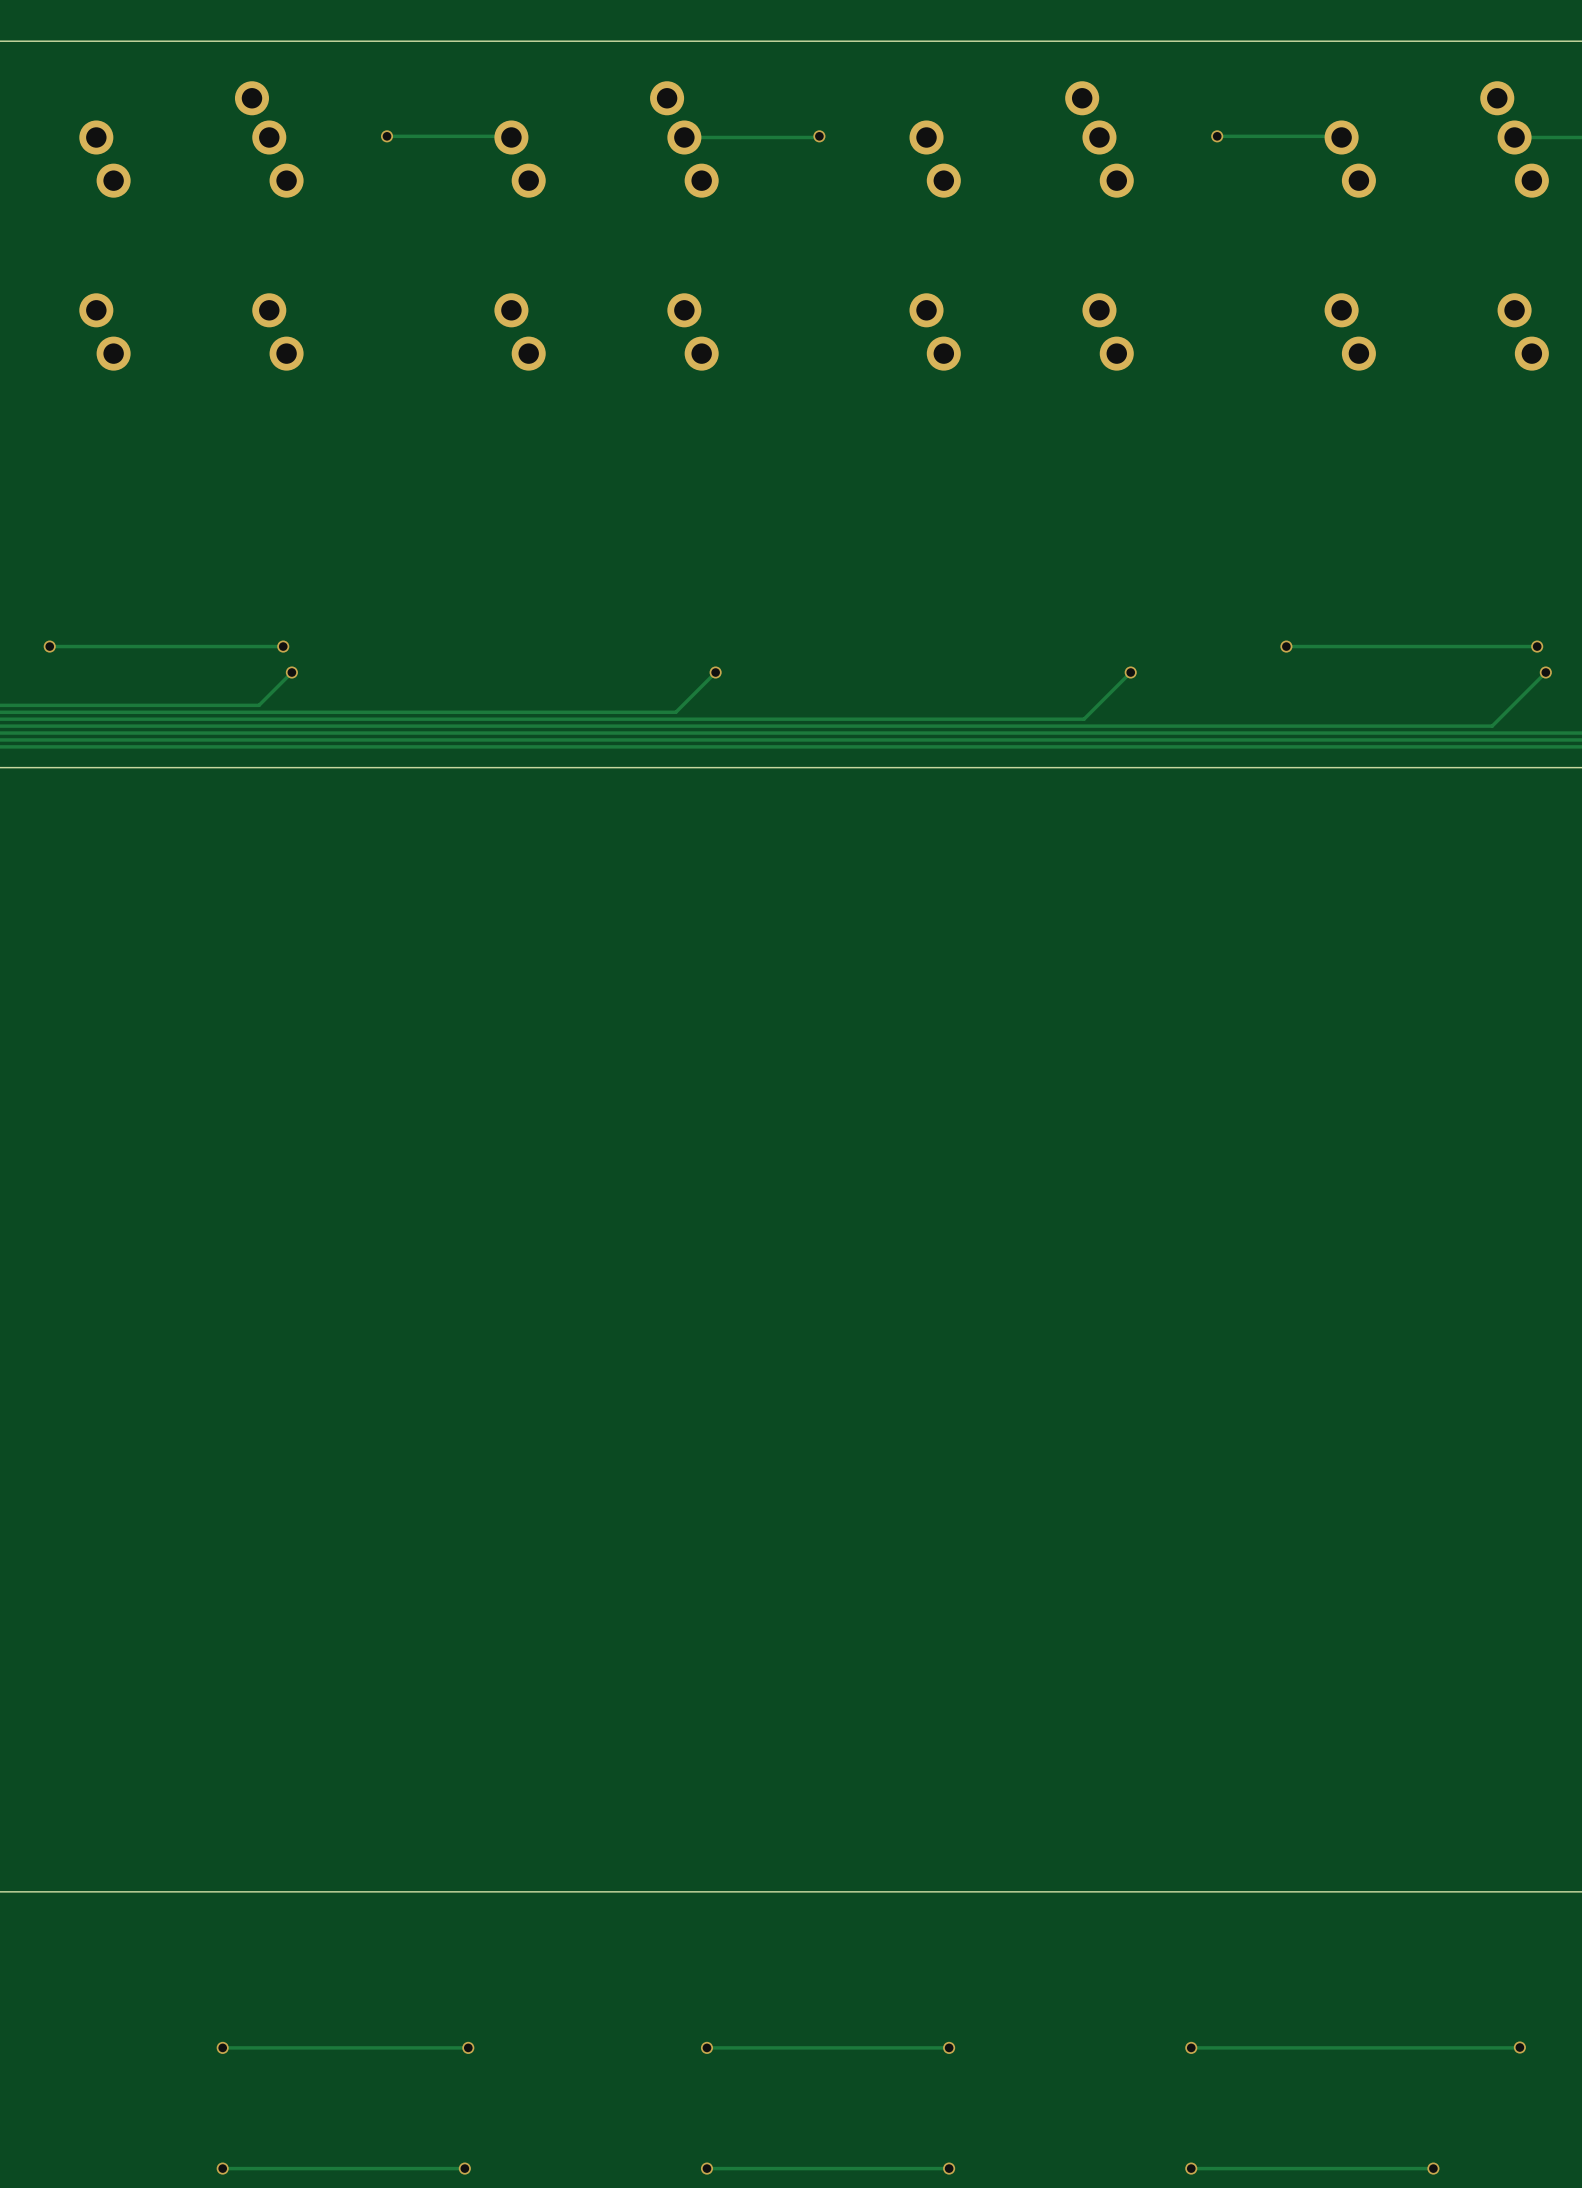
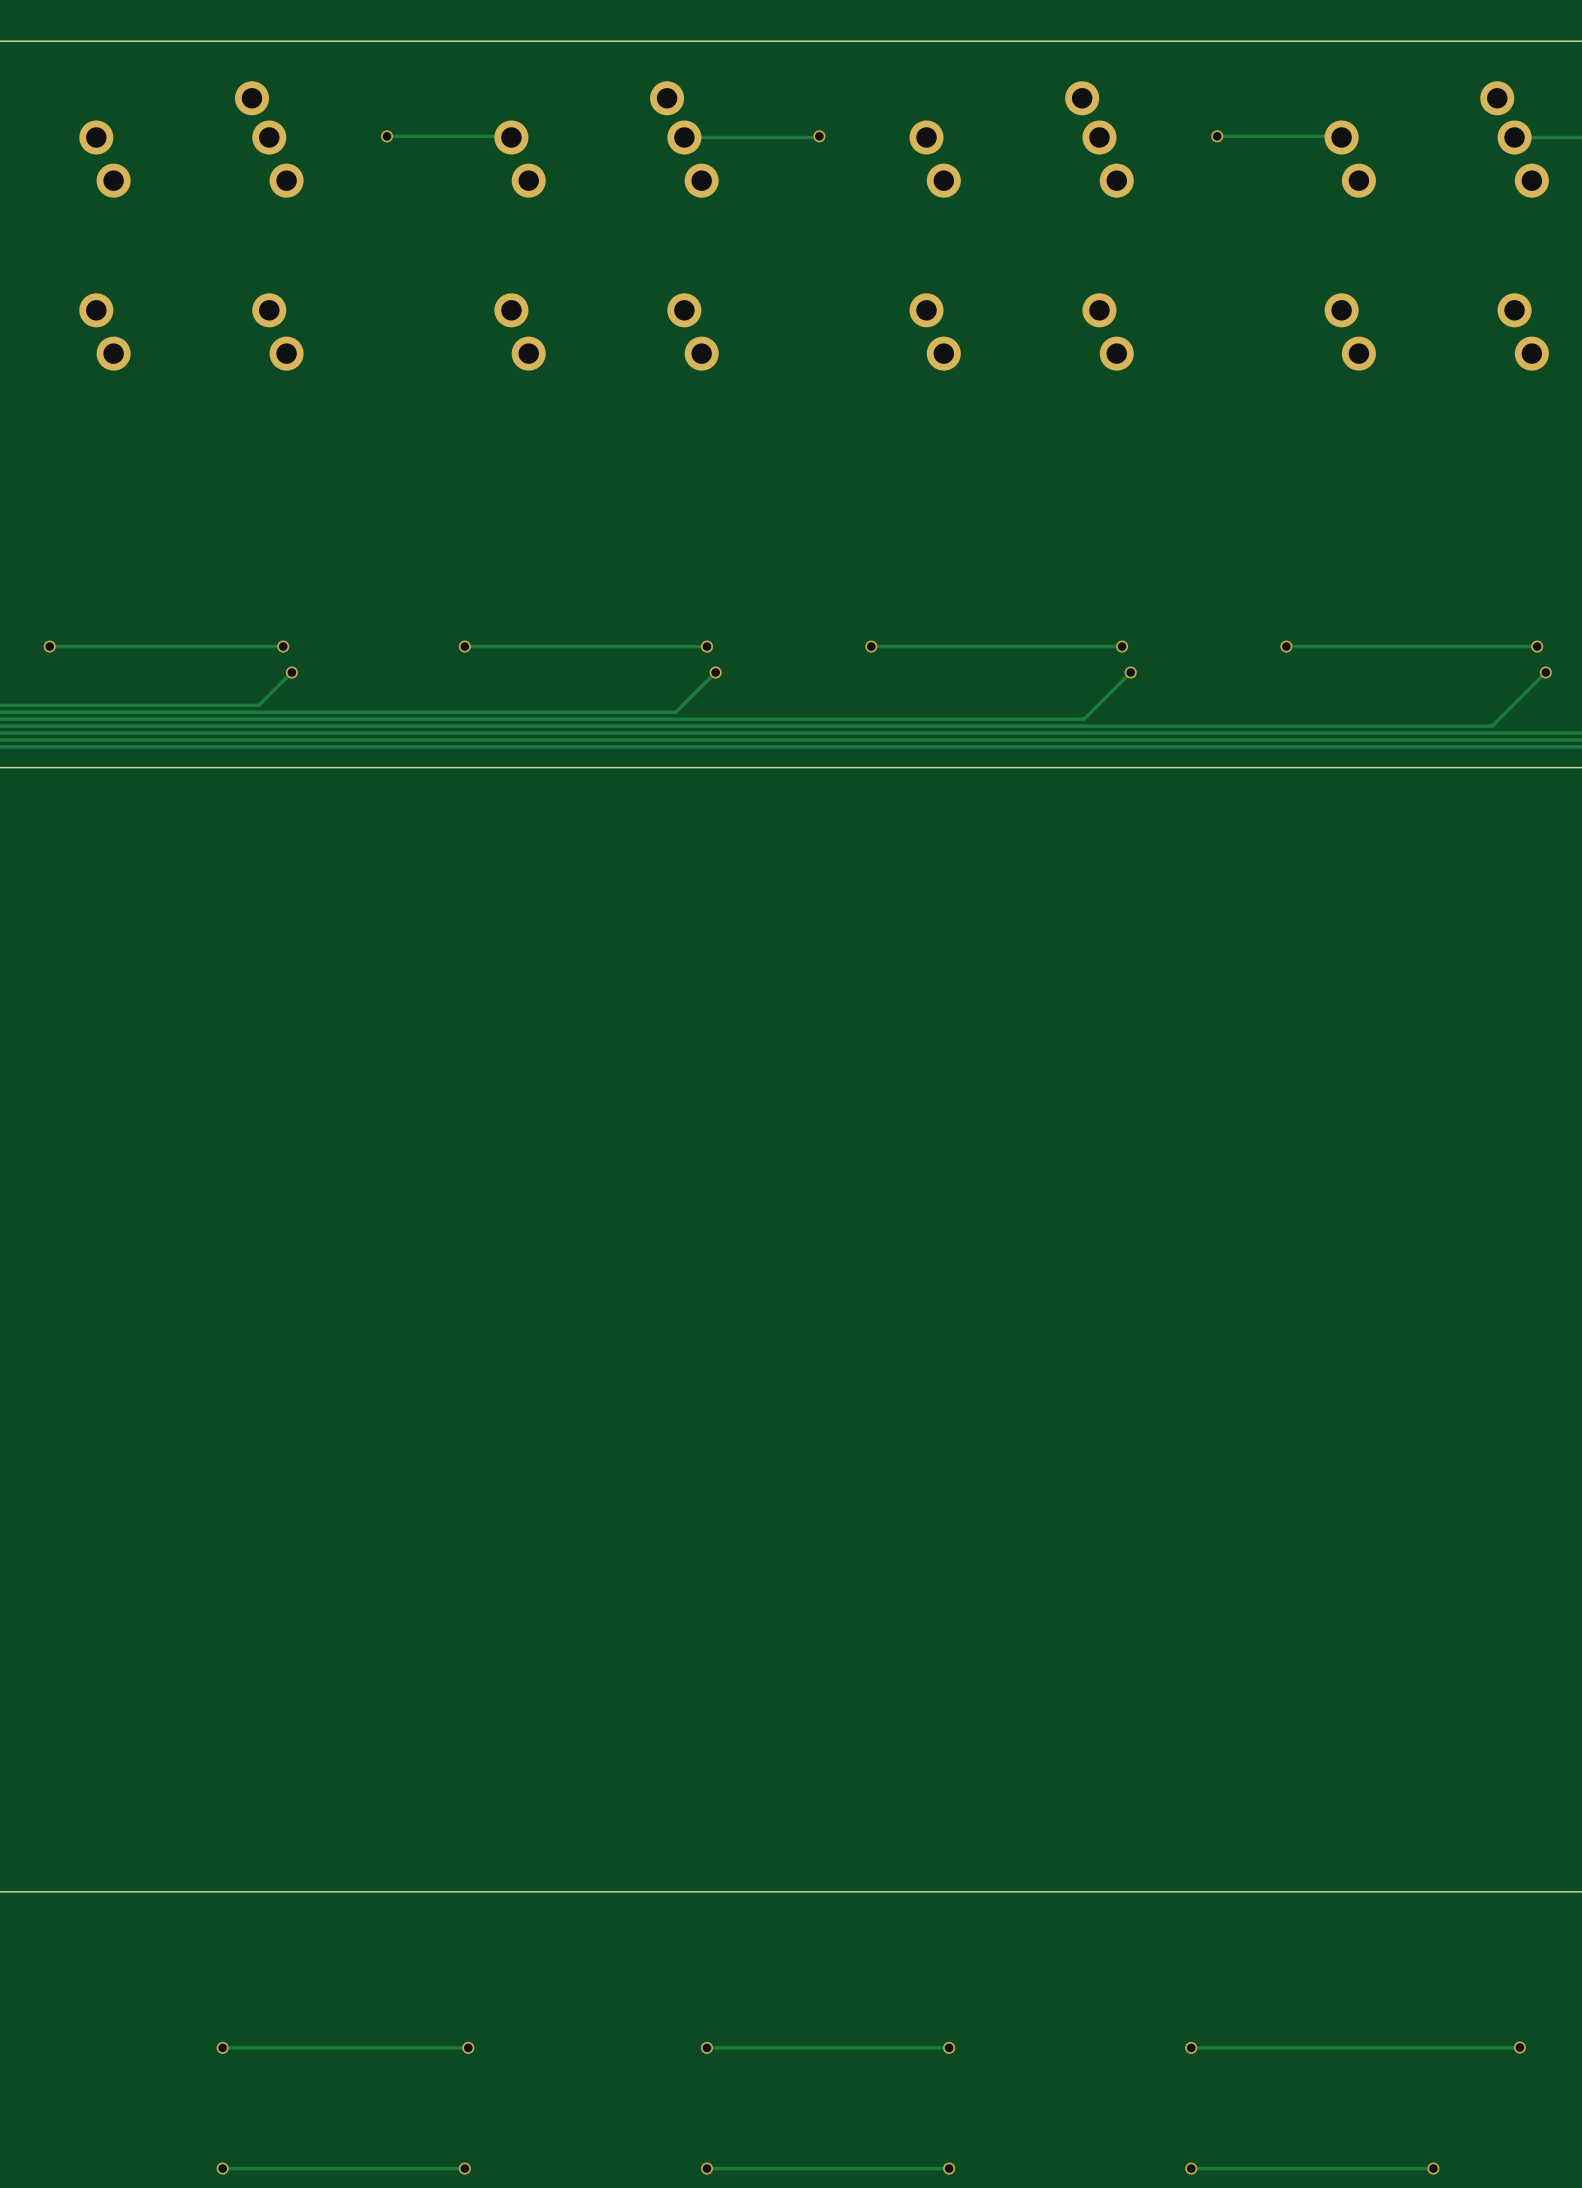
via: none -> (464, 646)
track: none -> (706, 646) (464, 646)
via: none -> (706, 646)
via: none -> (871, 646)
track: none -> (1122, 646) (871, 646)
via: none -> (1122, 646)

